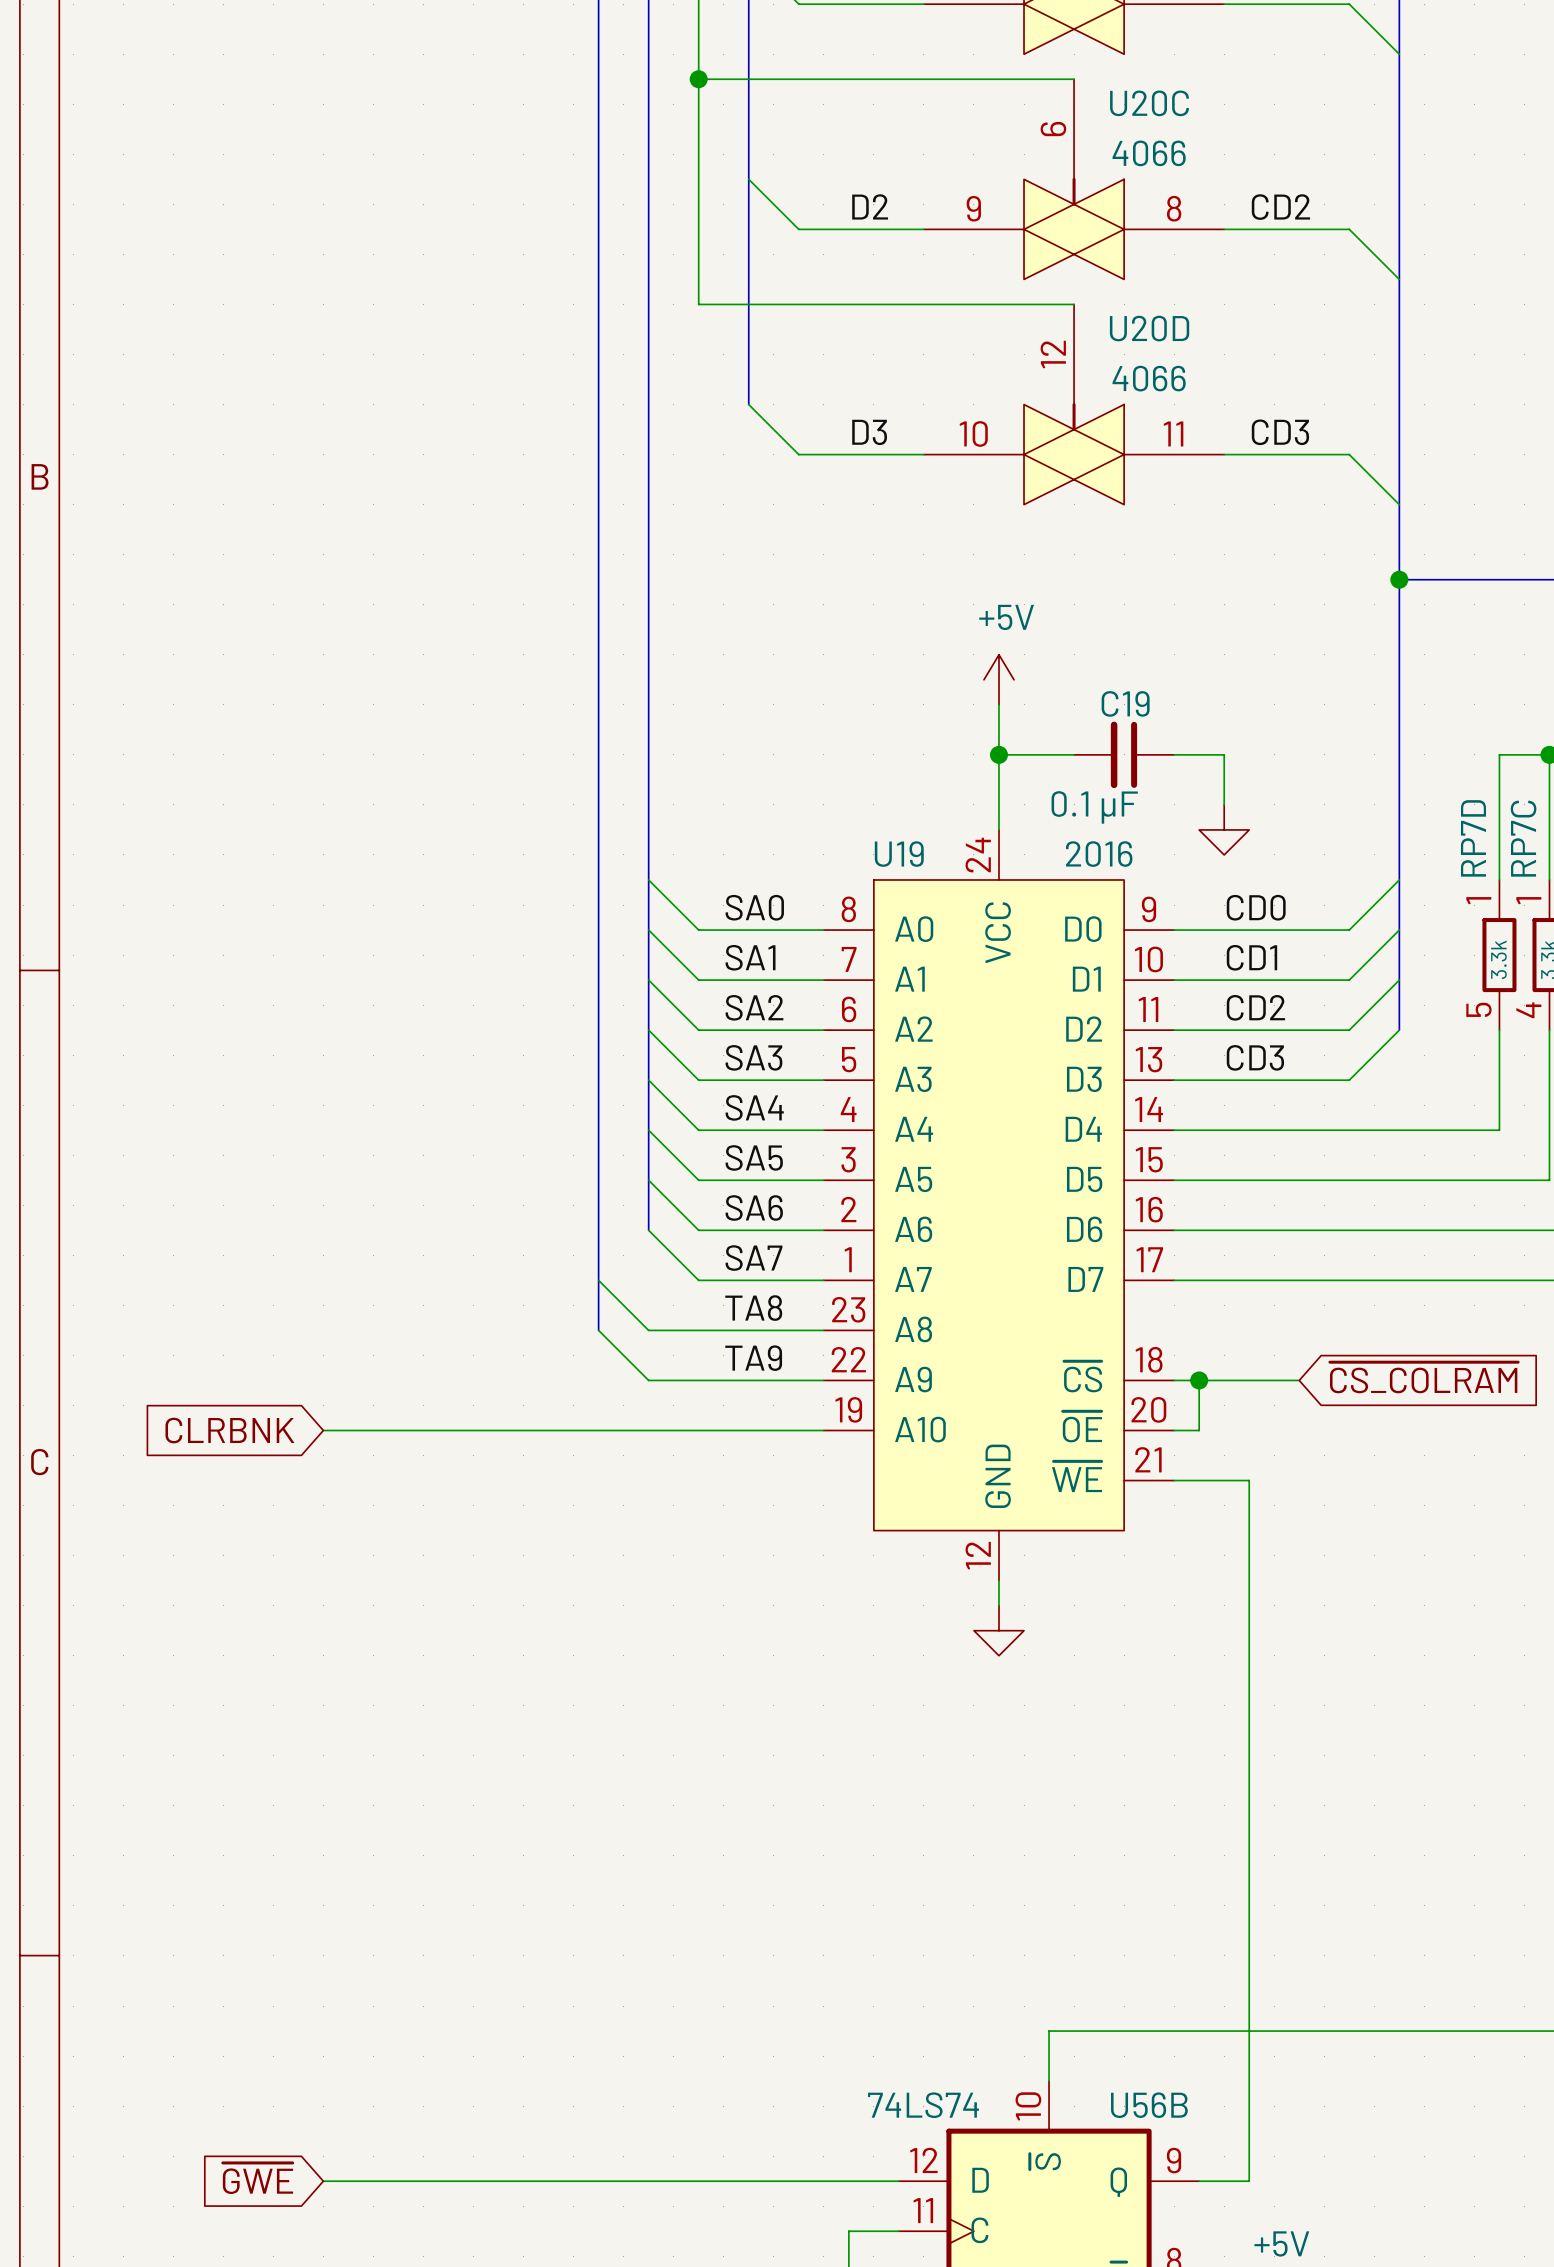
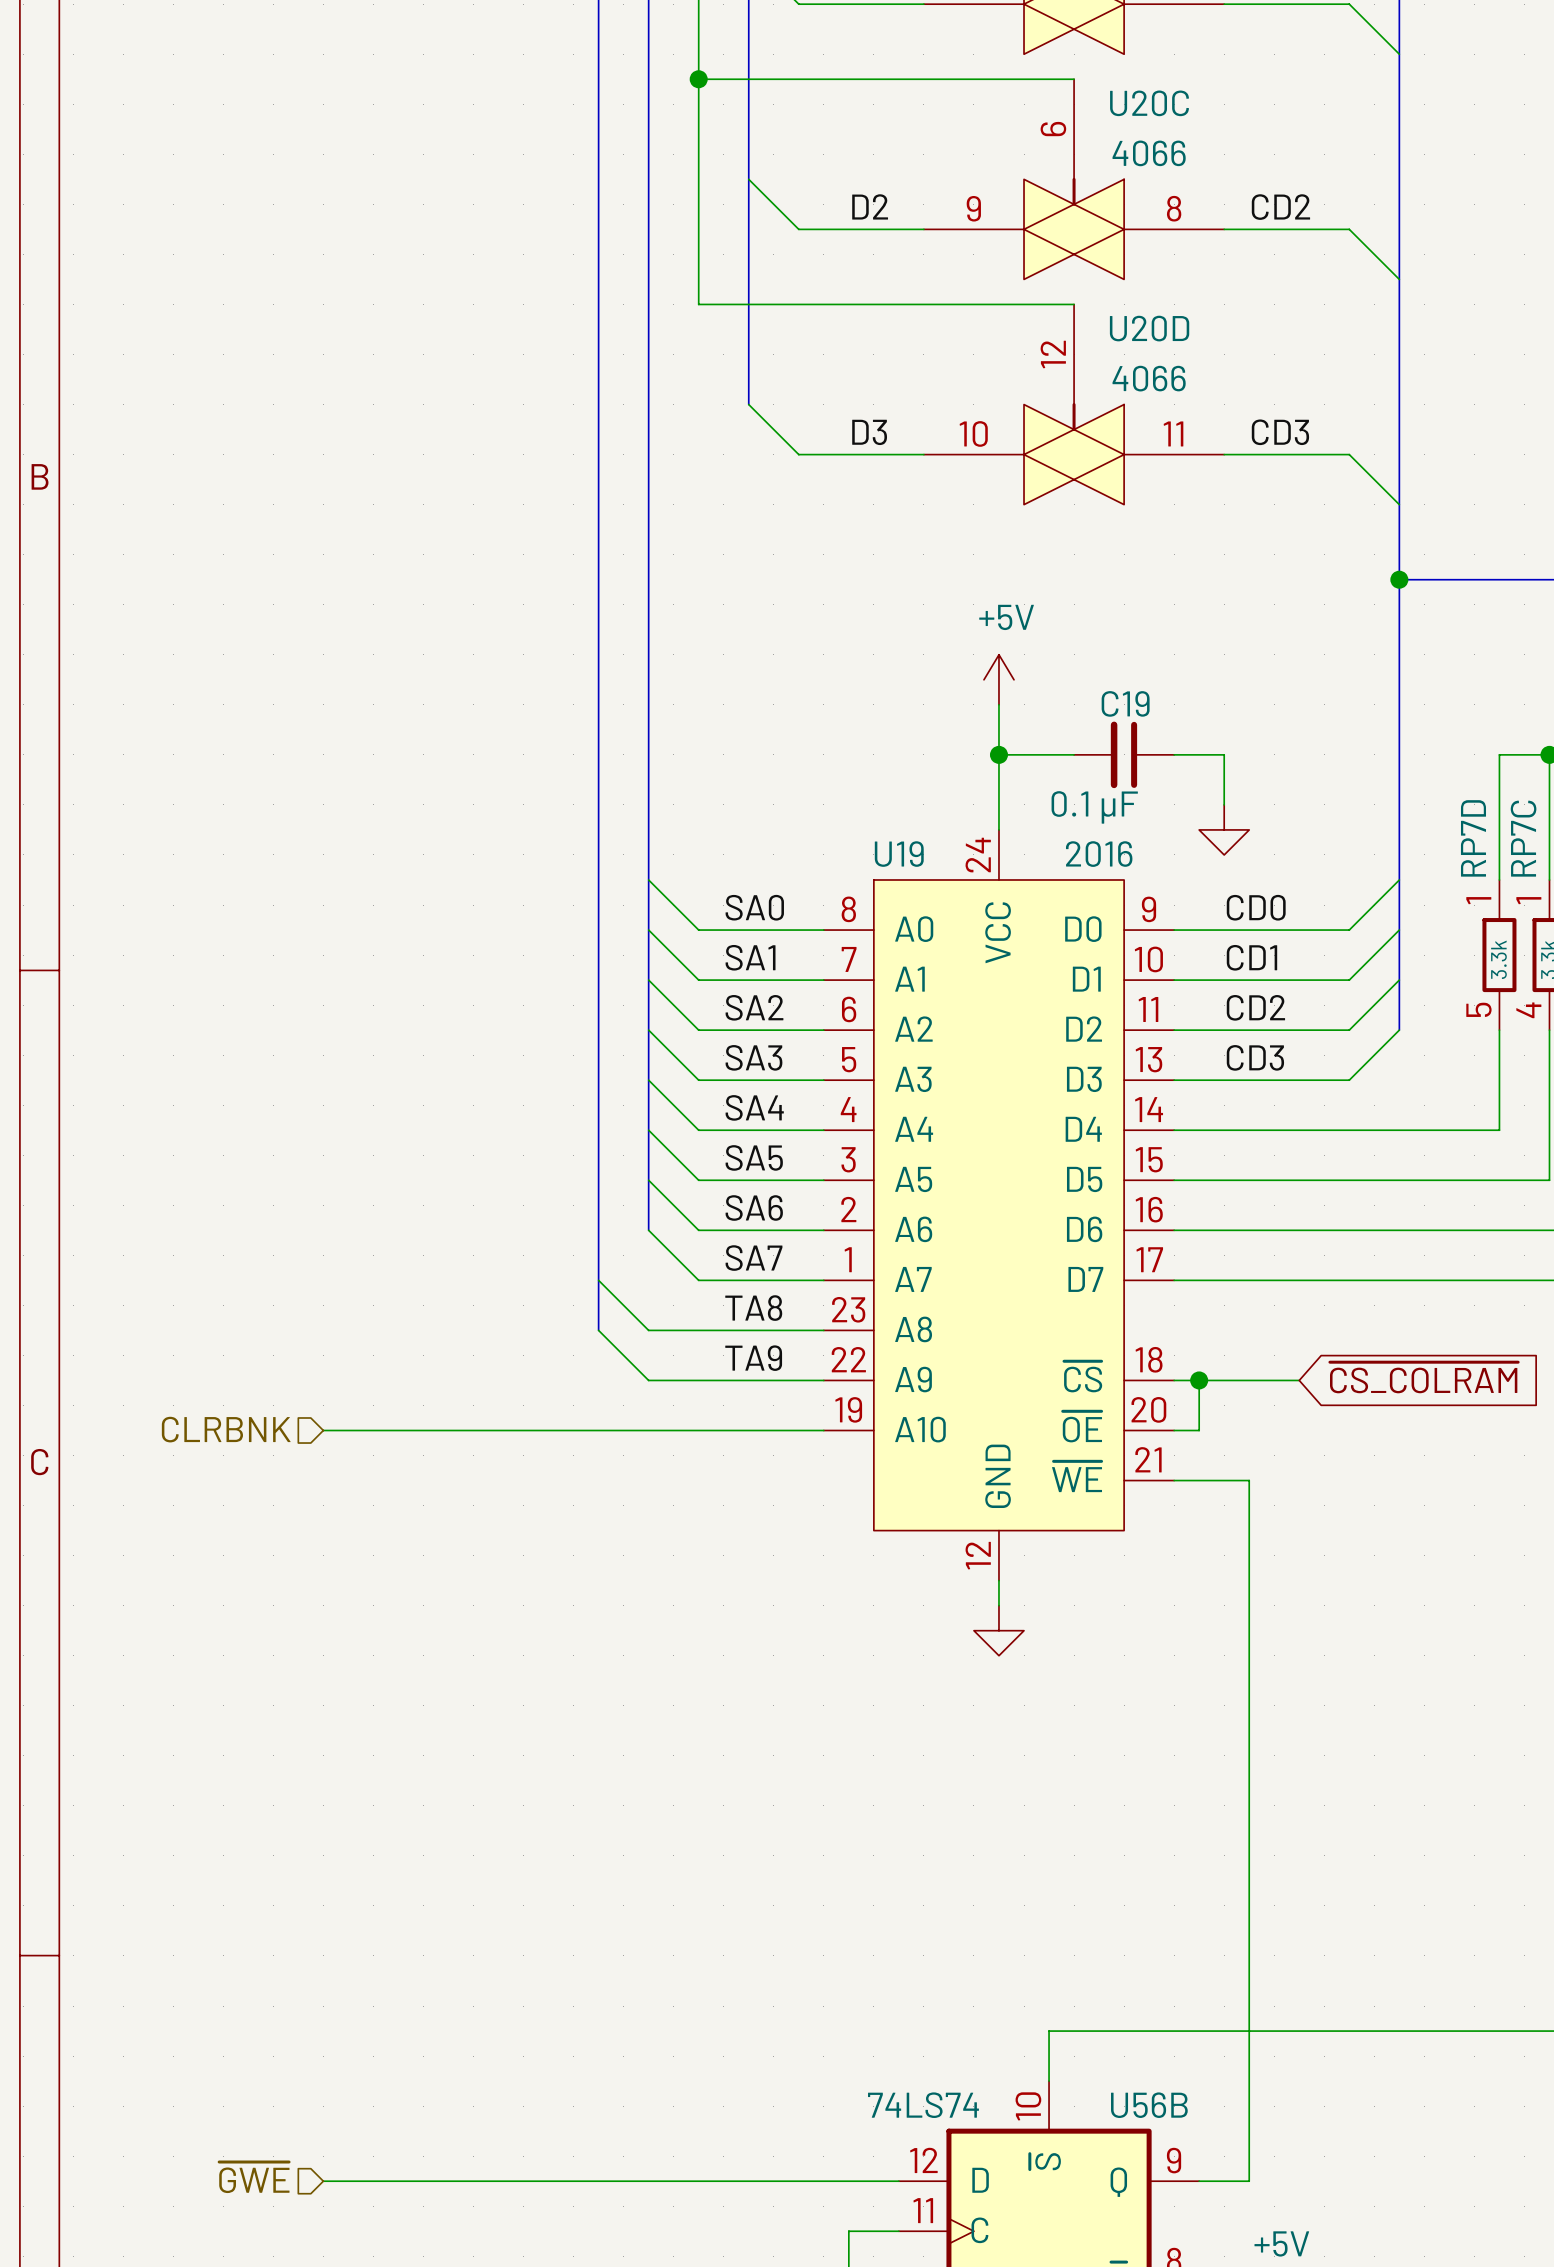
hierarchical label: none -> CLRBNK (226, 1429)
global label: CLRBNK (229, 1430) -> none
hierarchical label: none -> ~{GWE} (254, 2177)
global label: ~{GWE} (257, 2178) -> none

